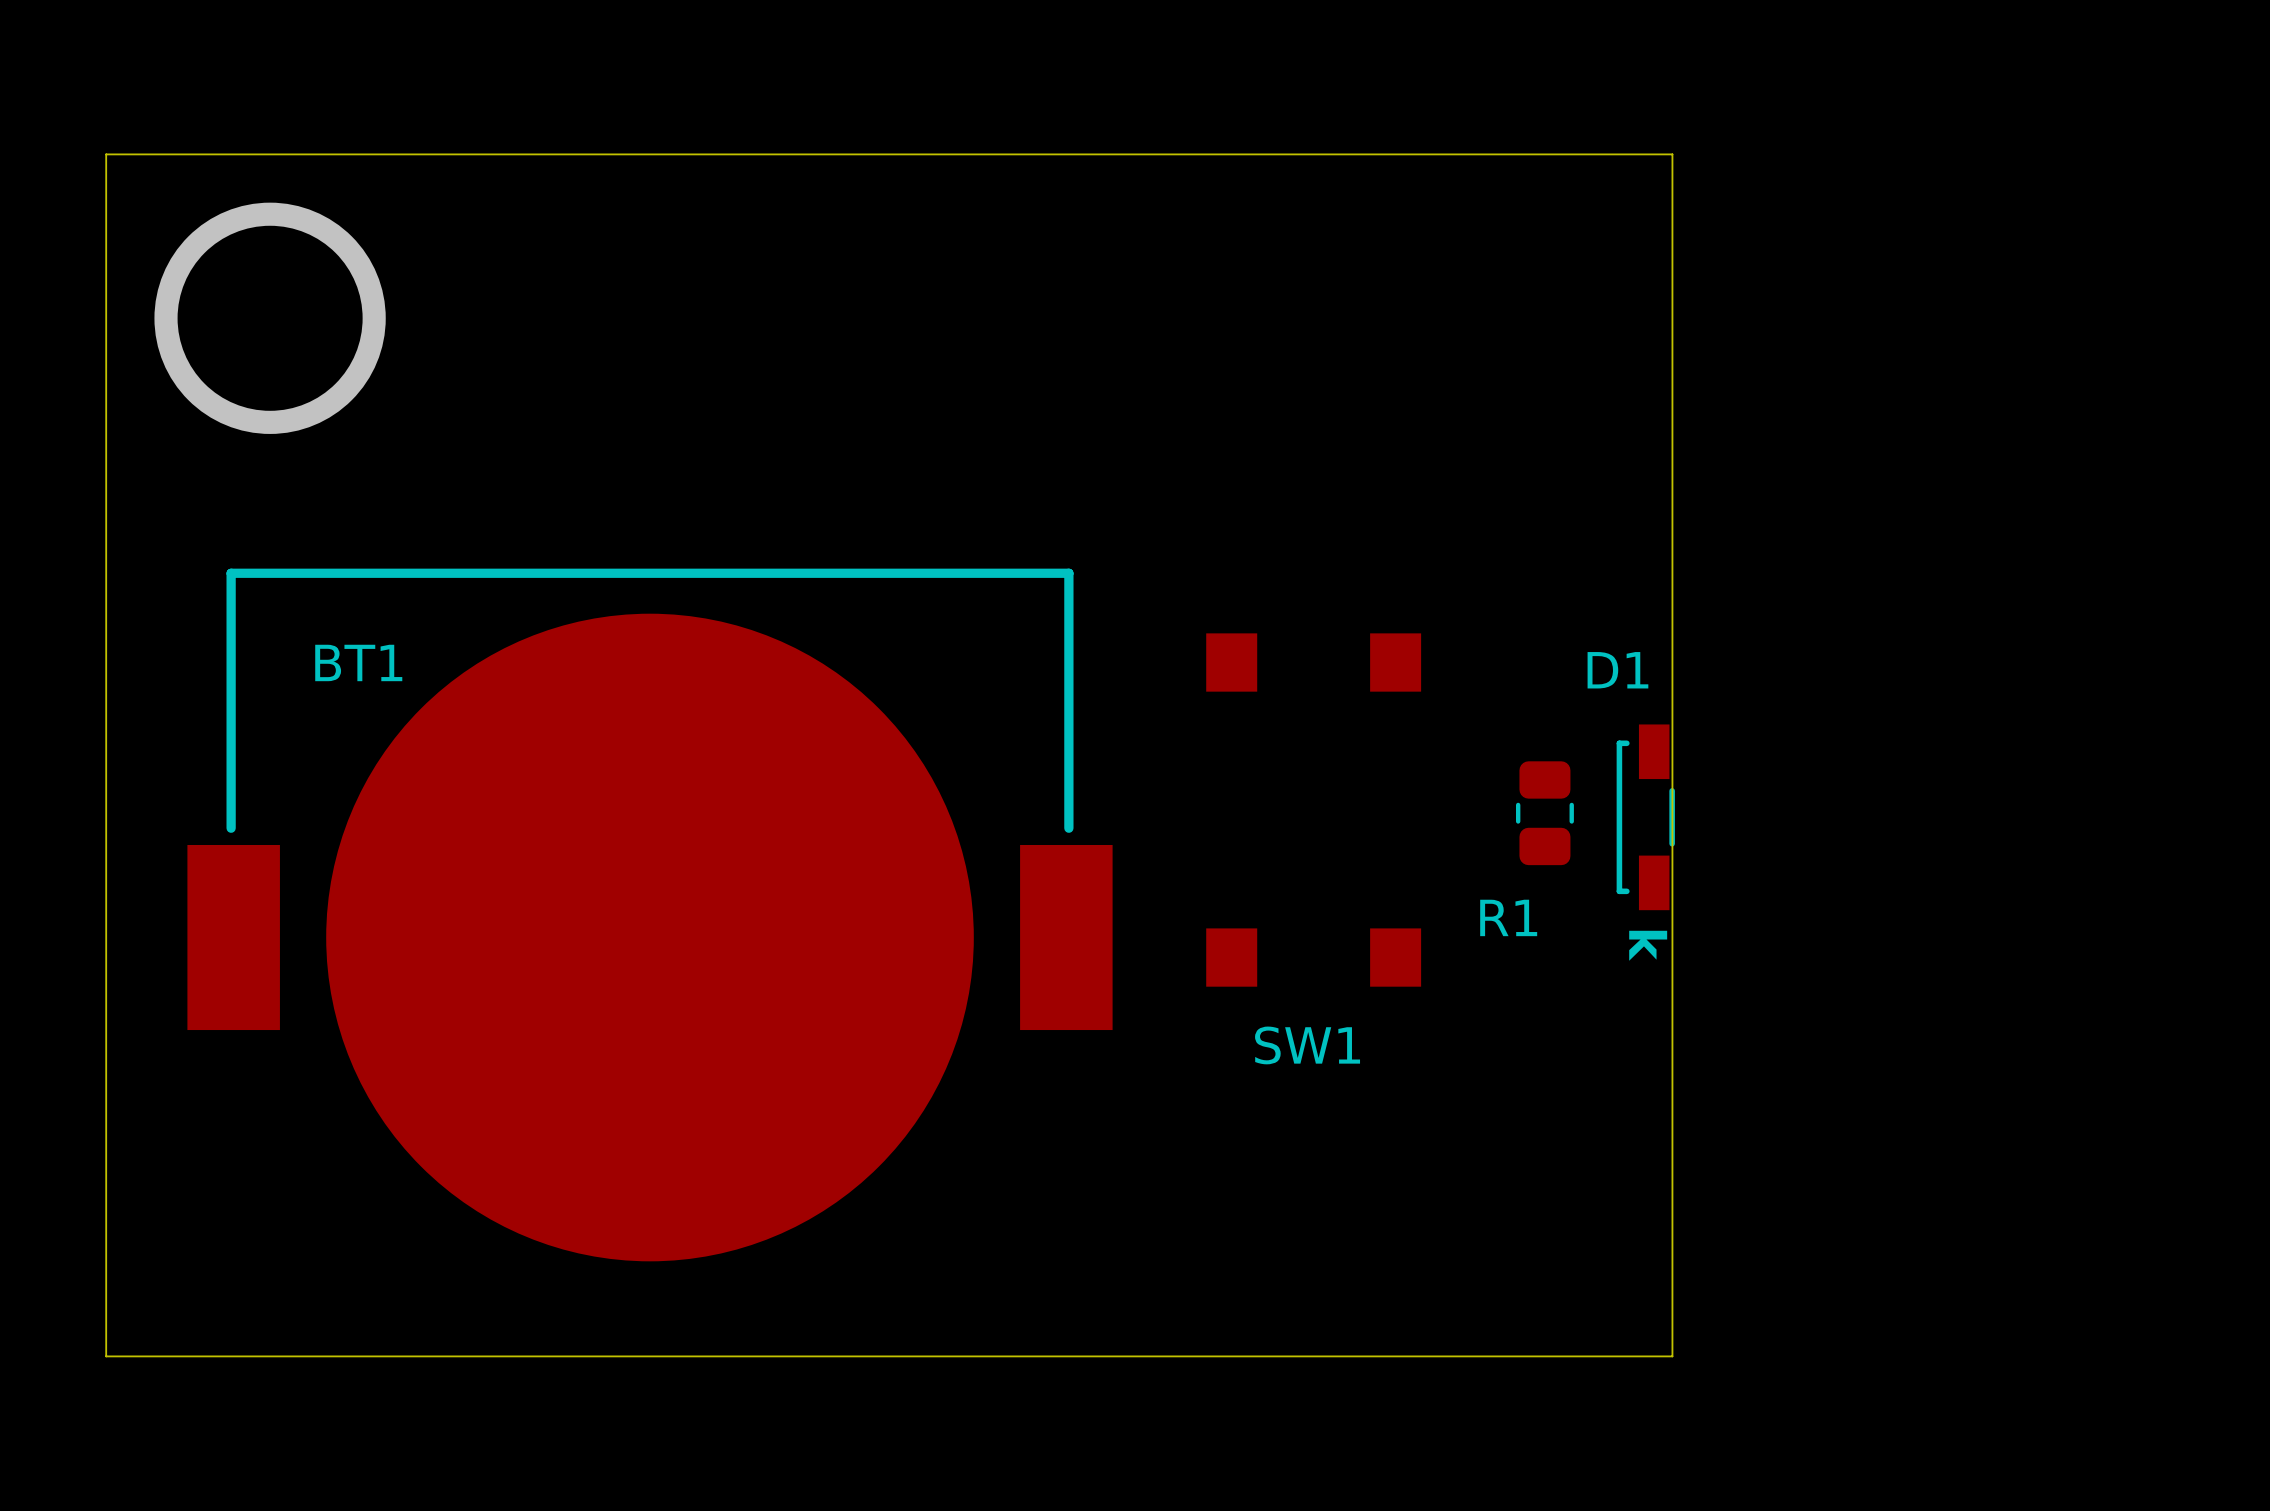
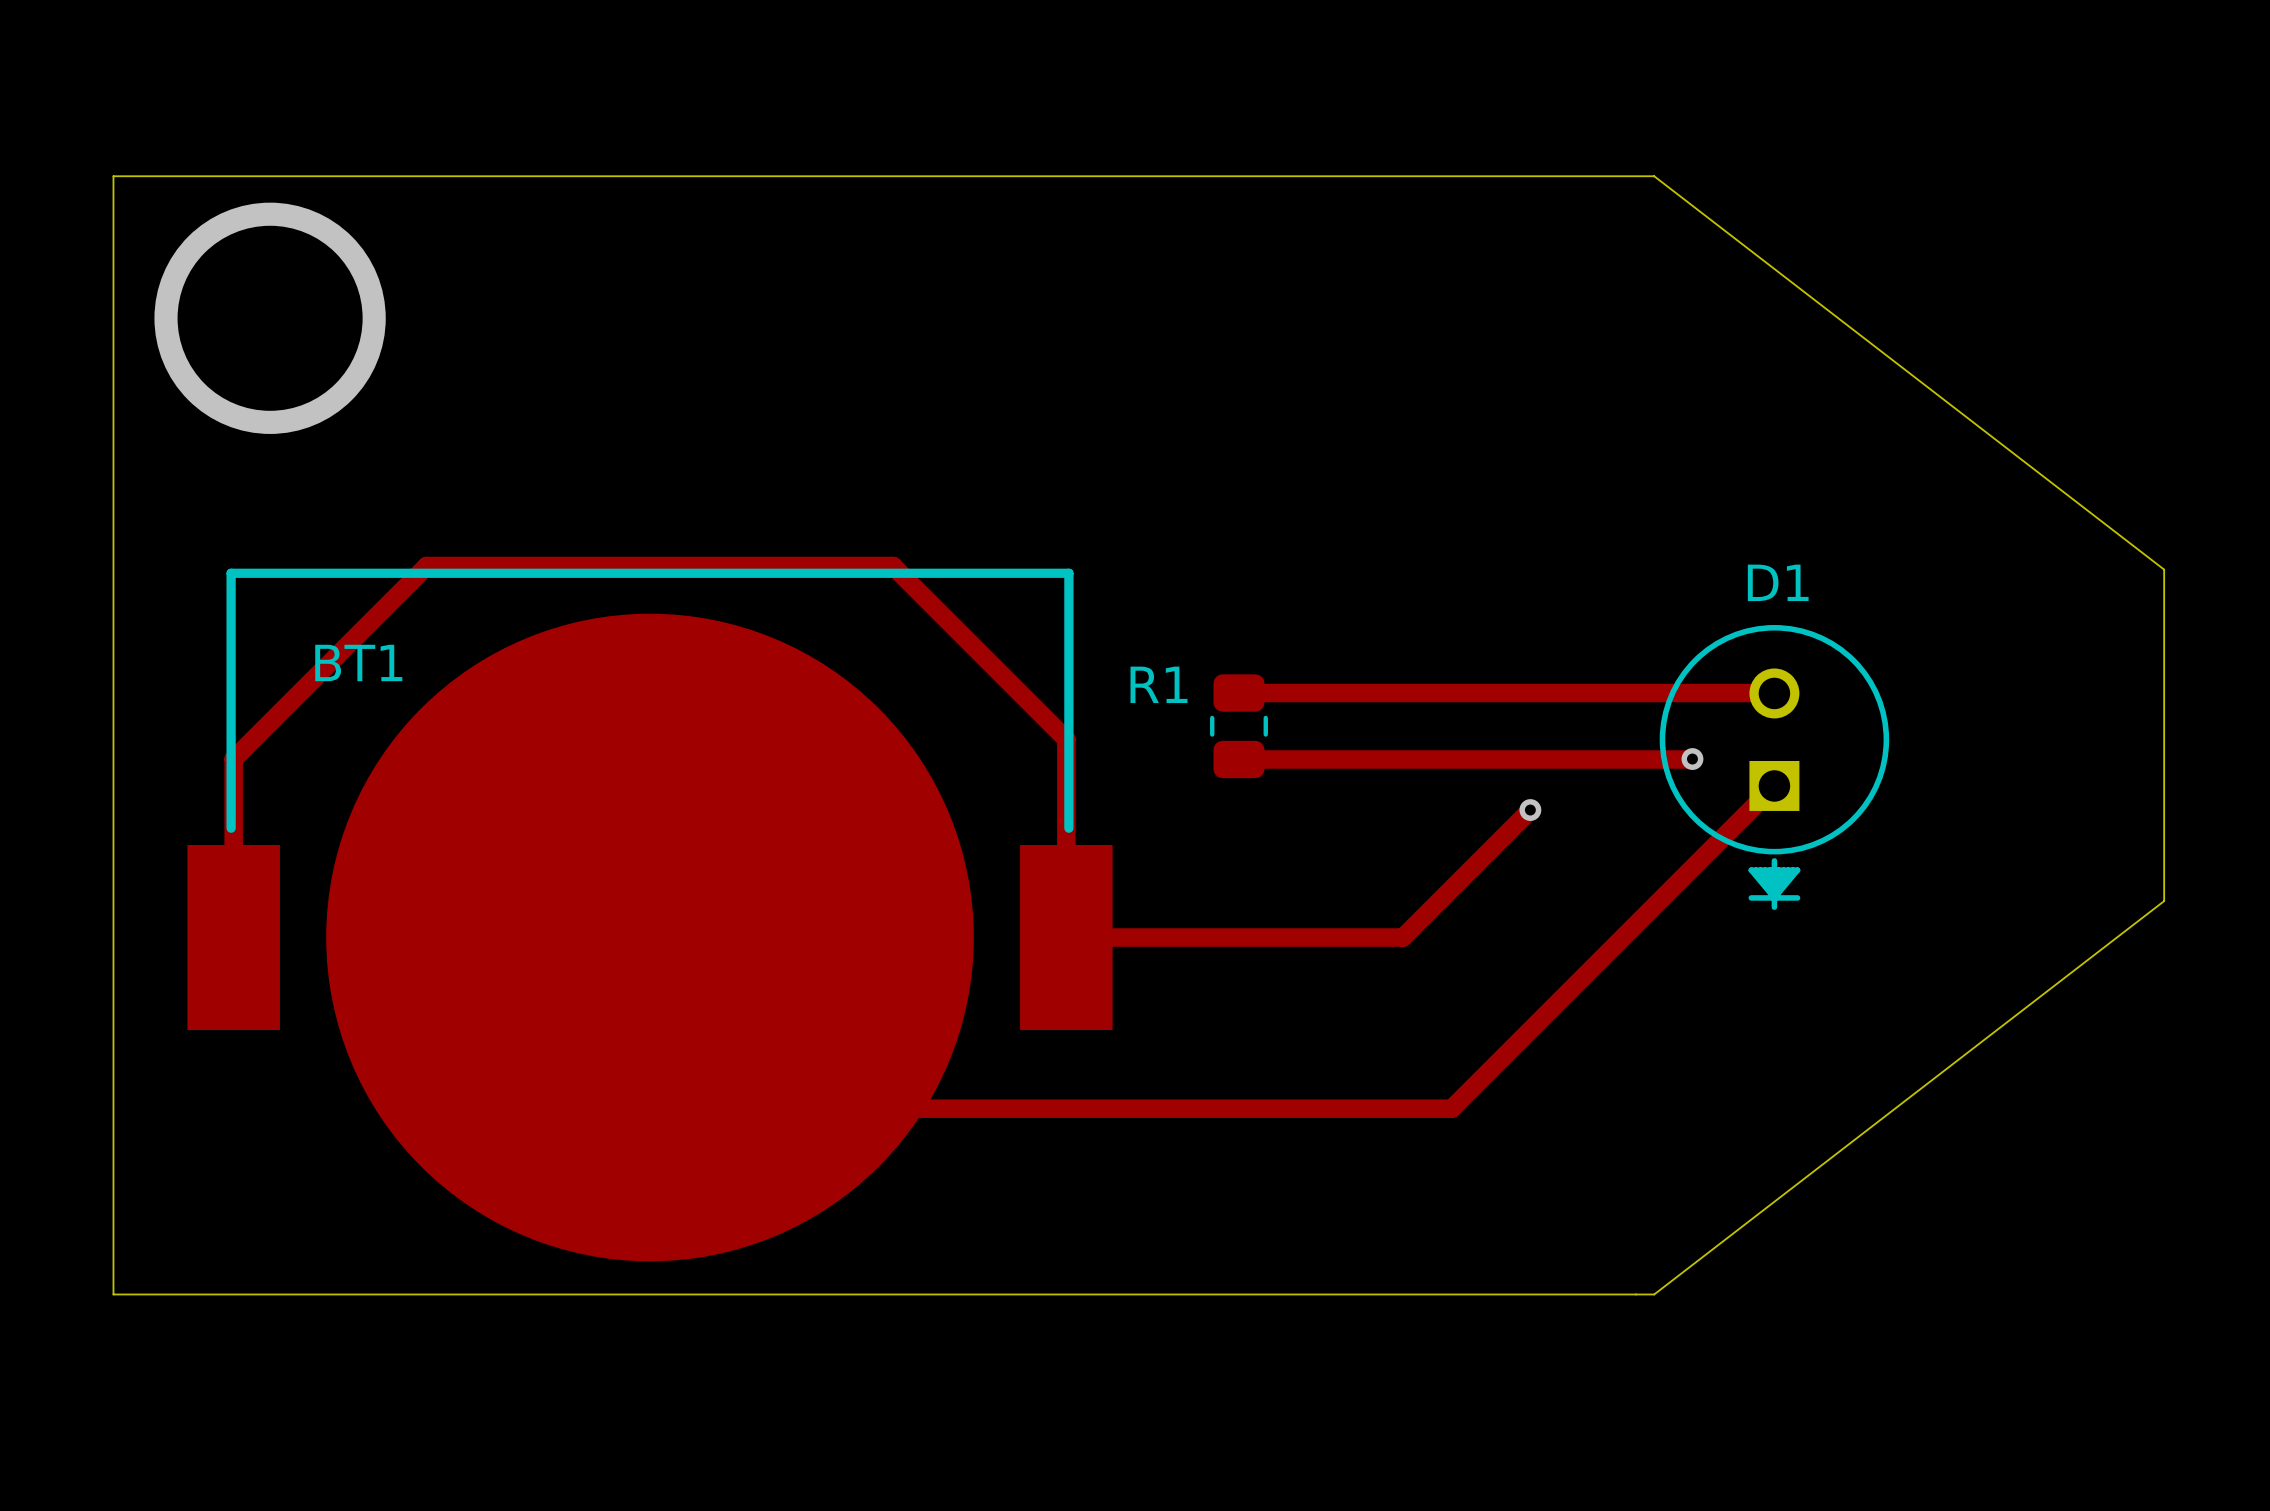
board edge: (106, 154) (1672, 154) (1672, 1356) (106, 1356) (106, 154) -> (113, 176) (113, 1294) (1654, 1294) (2164, 901) (2164, 569) (1654, 176) (113, 176)
track: none -> (1238, 693) (1773, 693)
D1 footprint: [1616, 724, 1675, 911] -> [1659, 625, 1890, 910]
track: none -> (1238, 759) (1690, 759)
via: none -> (1692, 759)
track: none -> (1774, 785) (1451, 1108) (821, 1108) (650, 937)
SW1: (1313, 810) -> none
track: none -> (1530, 810) (1402, 937) (1066, 937) (1066, 739) (892, 565) (426, 565) (233, 759) (233, 937)
via: none -> (1530, 810)
R1 position: (1544, 813) -> (1238, 726)
R1 name position: R1 (1508, 917) -> R1 (1159, 684)

